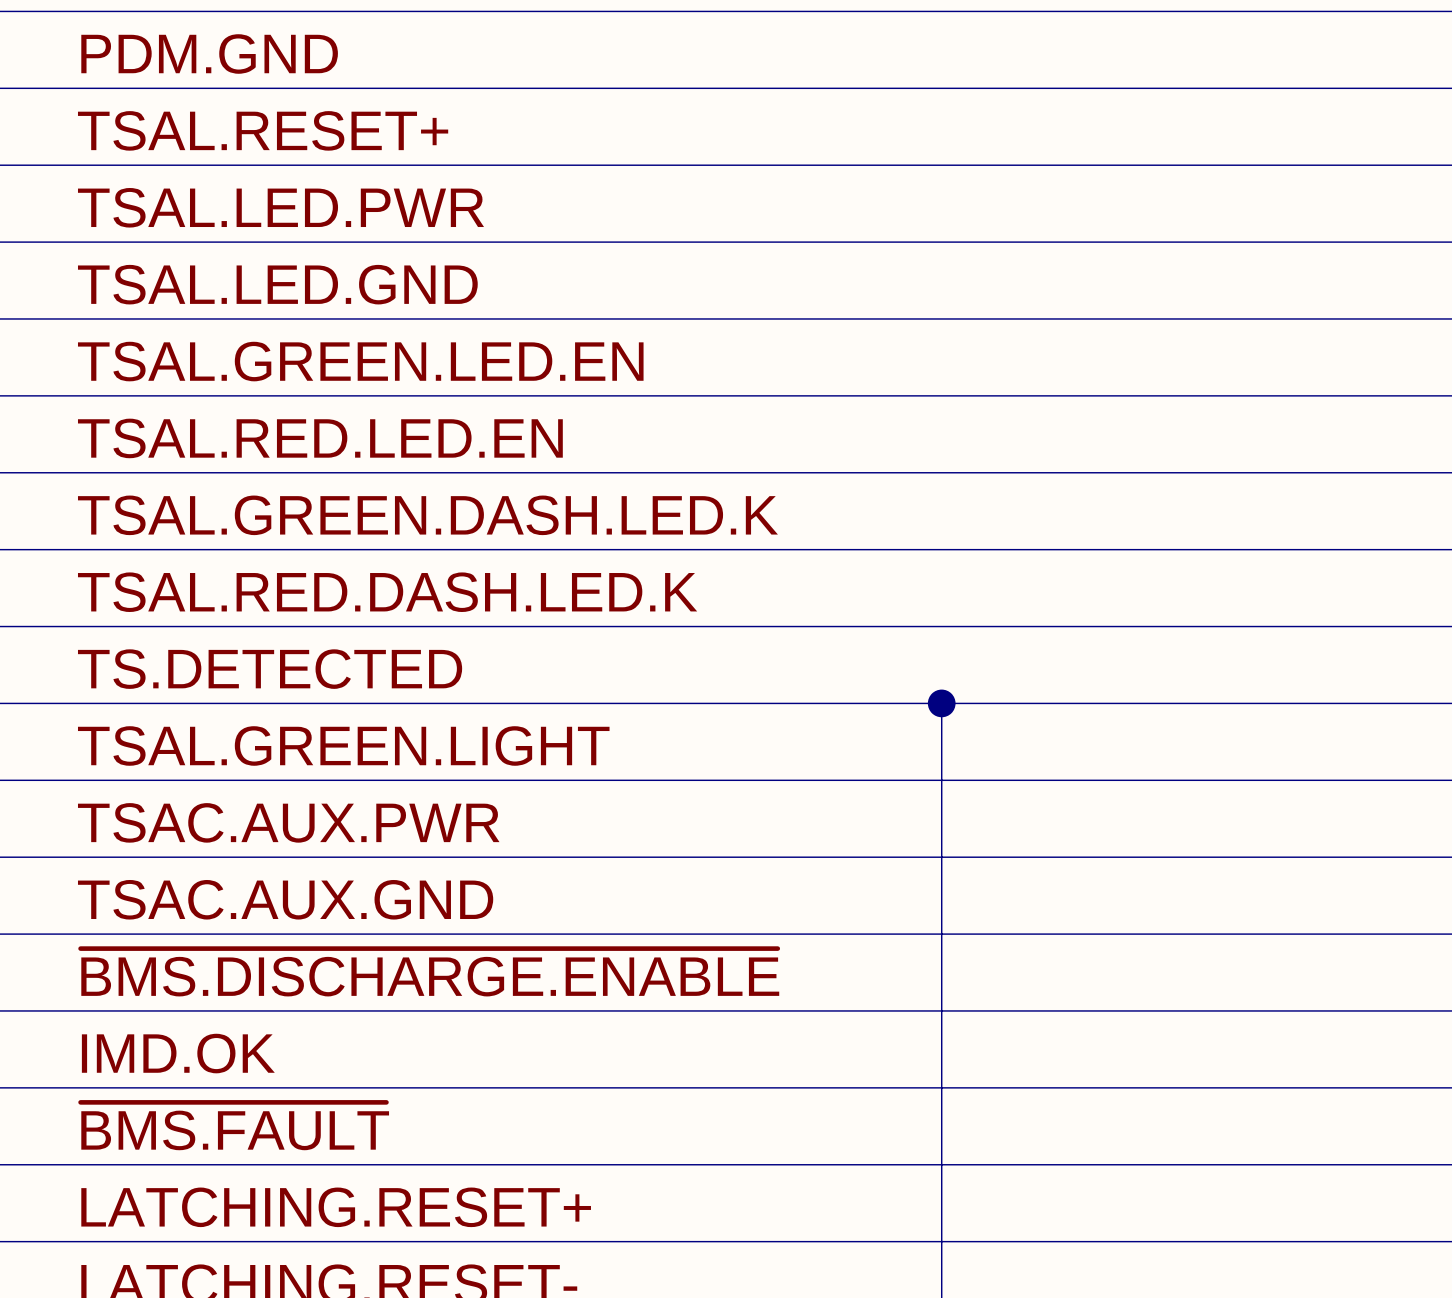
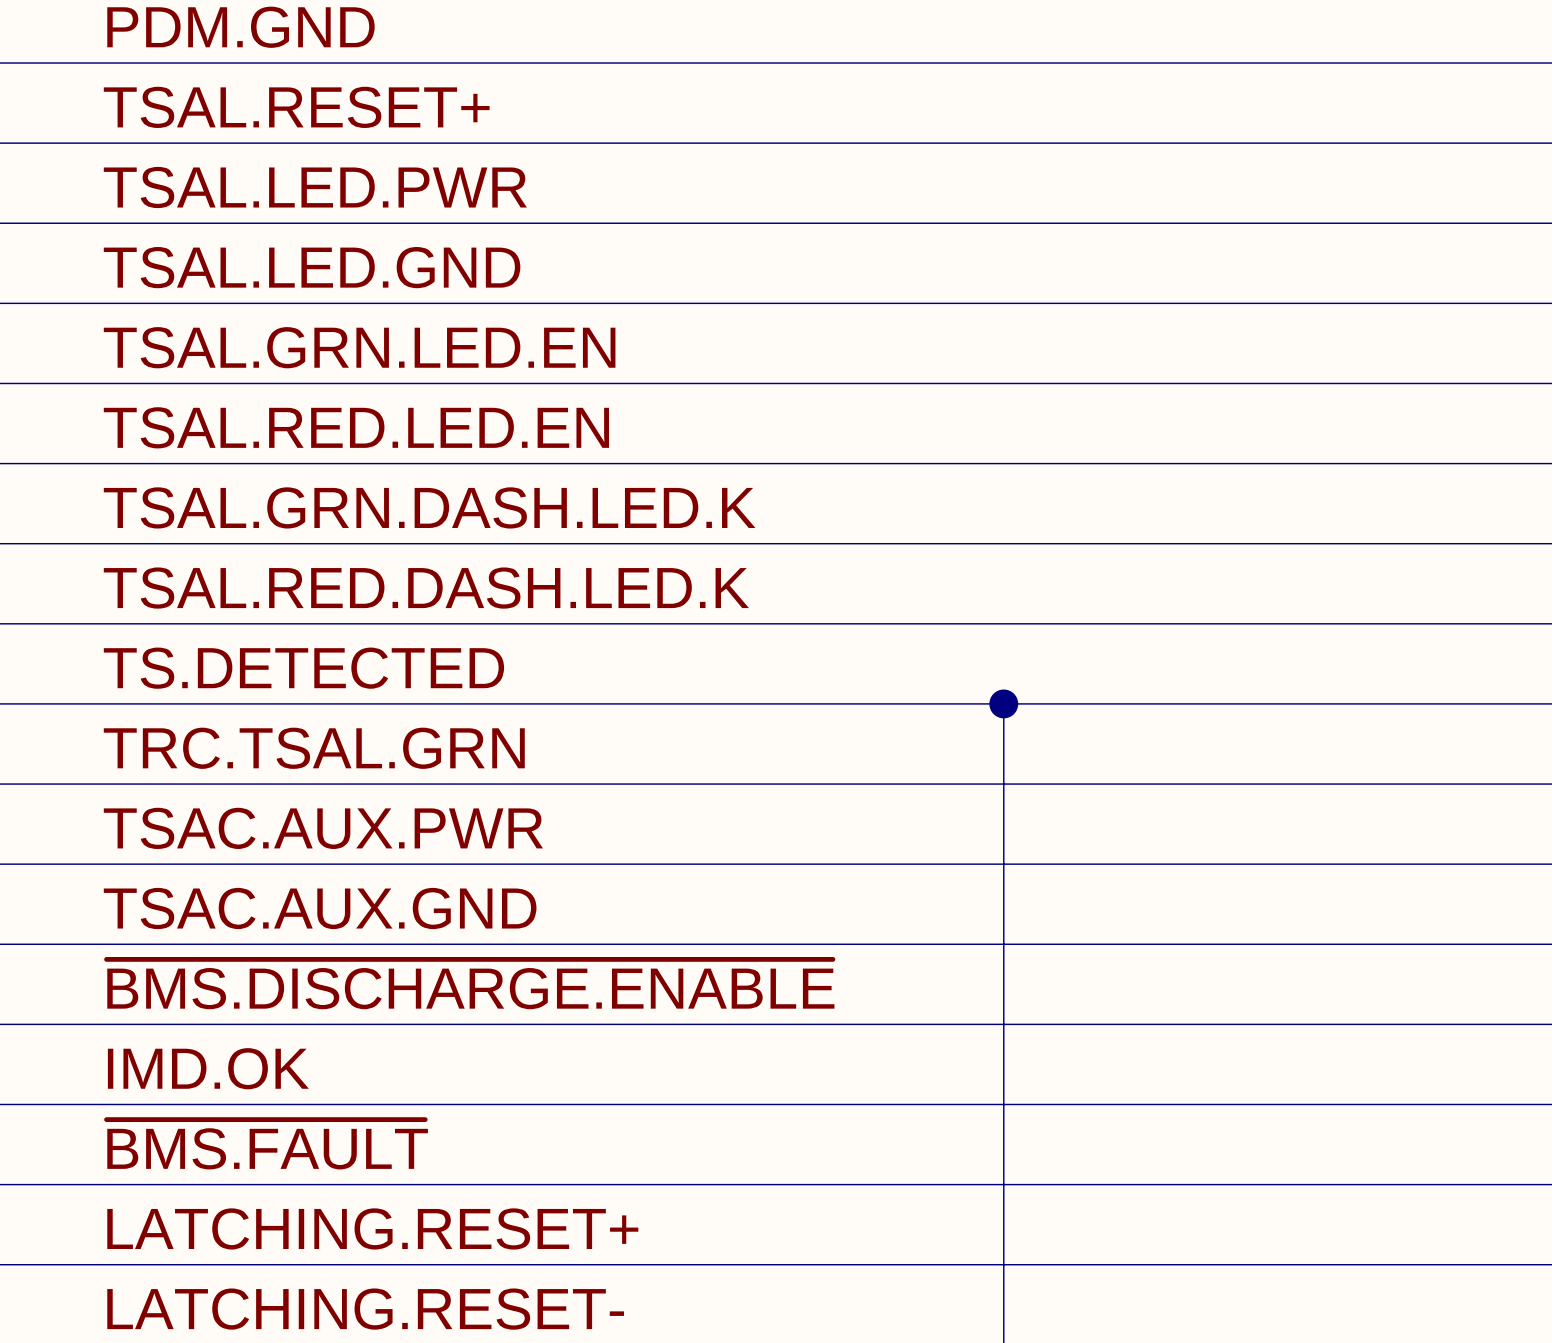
label: TSAL.GREEN.LED.EN (360, 361) -> TSAL.GRN.LED.EN (359, 347)
label: TSAL.GREEN.DASH.LED.K (427, 515) -> TSAL.GRN.DASH.LED.K (429, 507)
label: TSAL.GREEN.LIGHT (343, 745) -> TRC.TSAL.GRN (314, 748)

